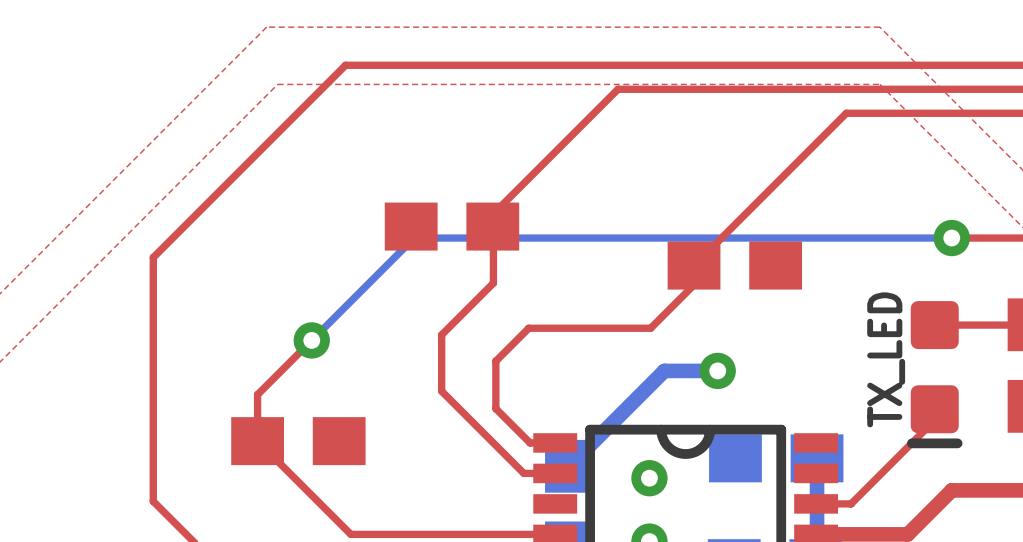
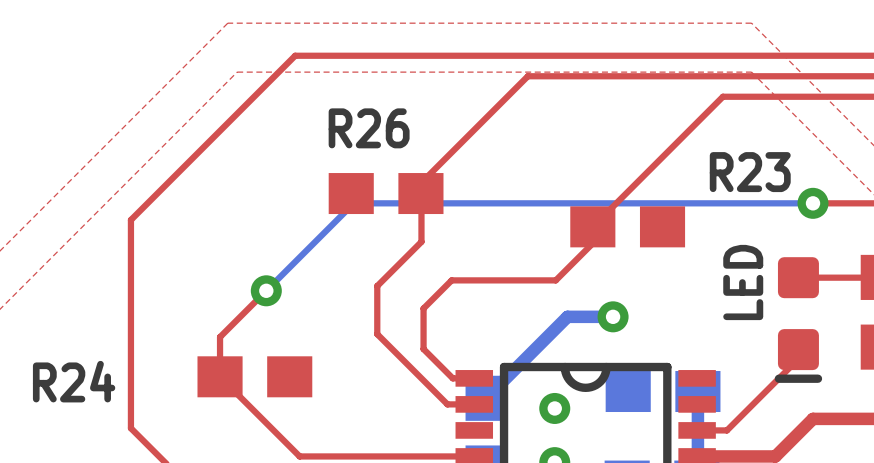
text: none -> R26 (369, 128)
text: none -> R23 (750, 172)
text: none -> LED (743, 282)
TX_LED name: TX_LED (886, 359) -> none
text: none -> R24 (74, 381)

